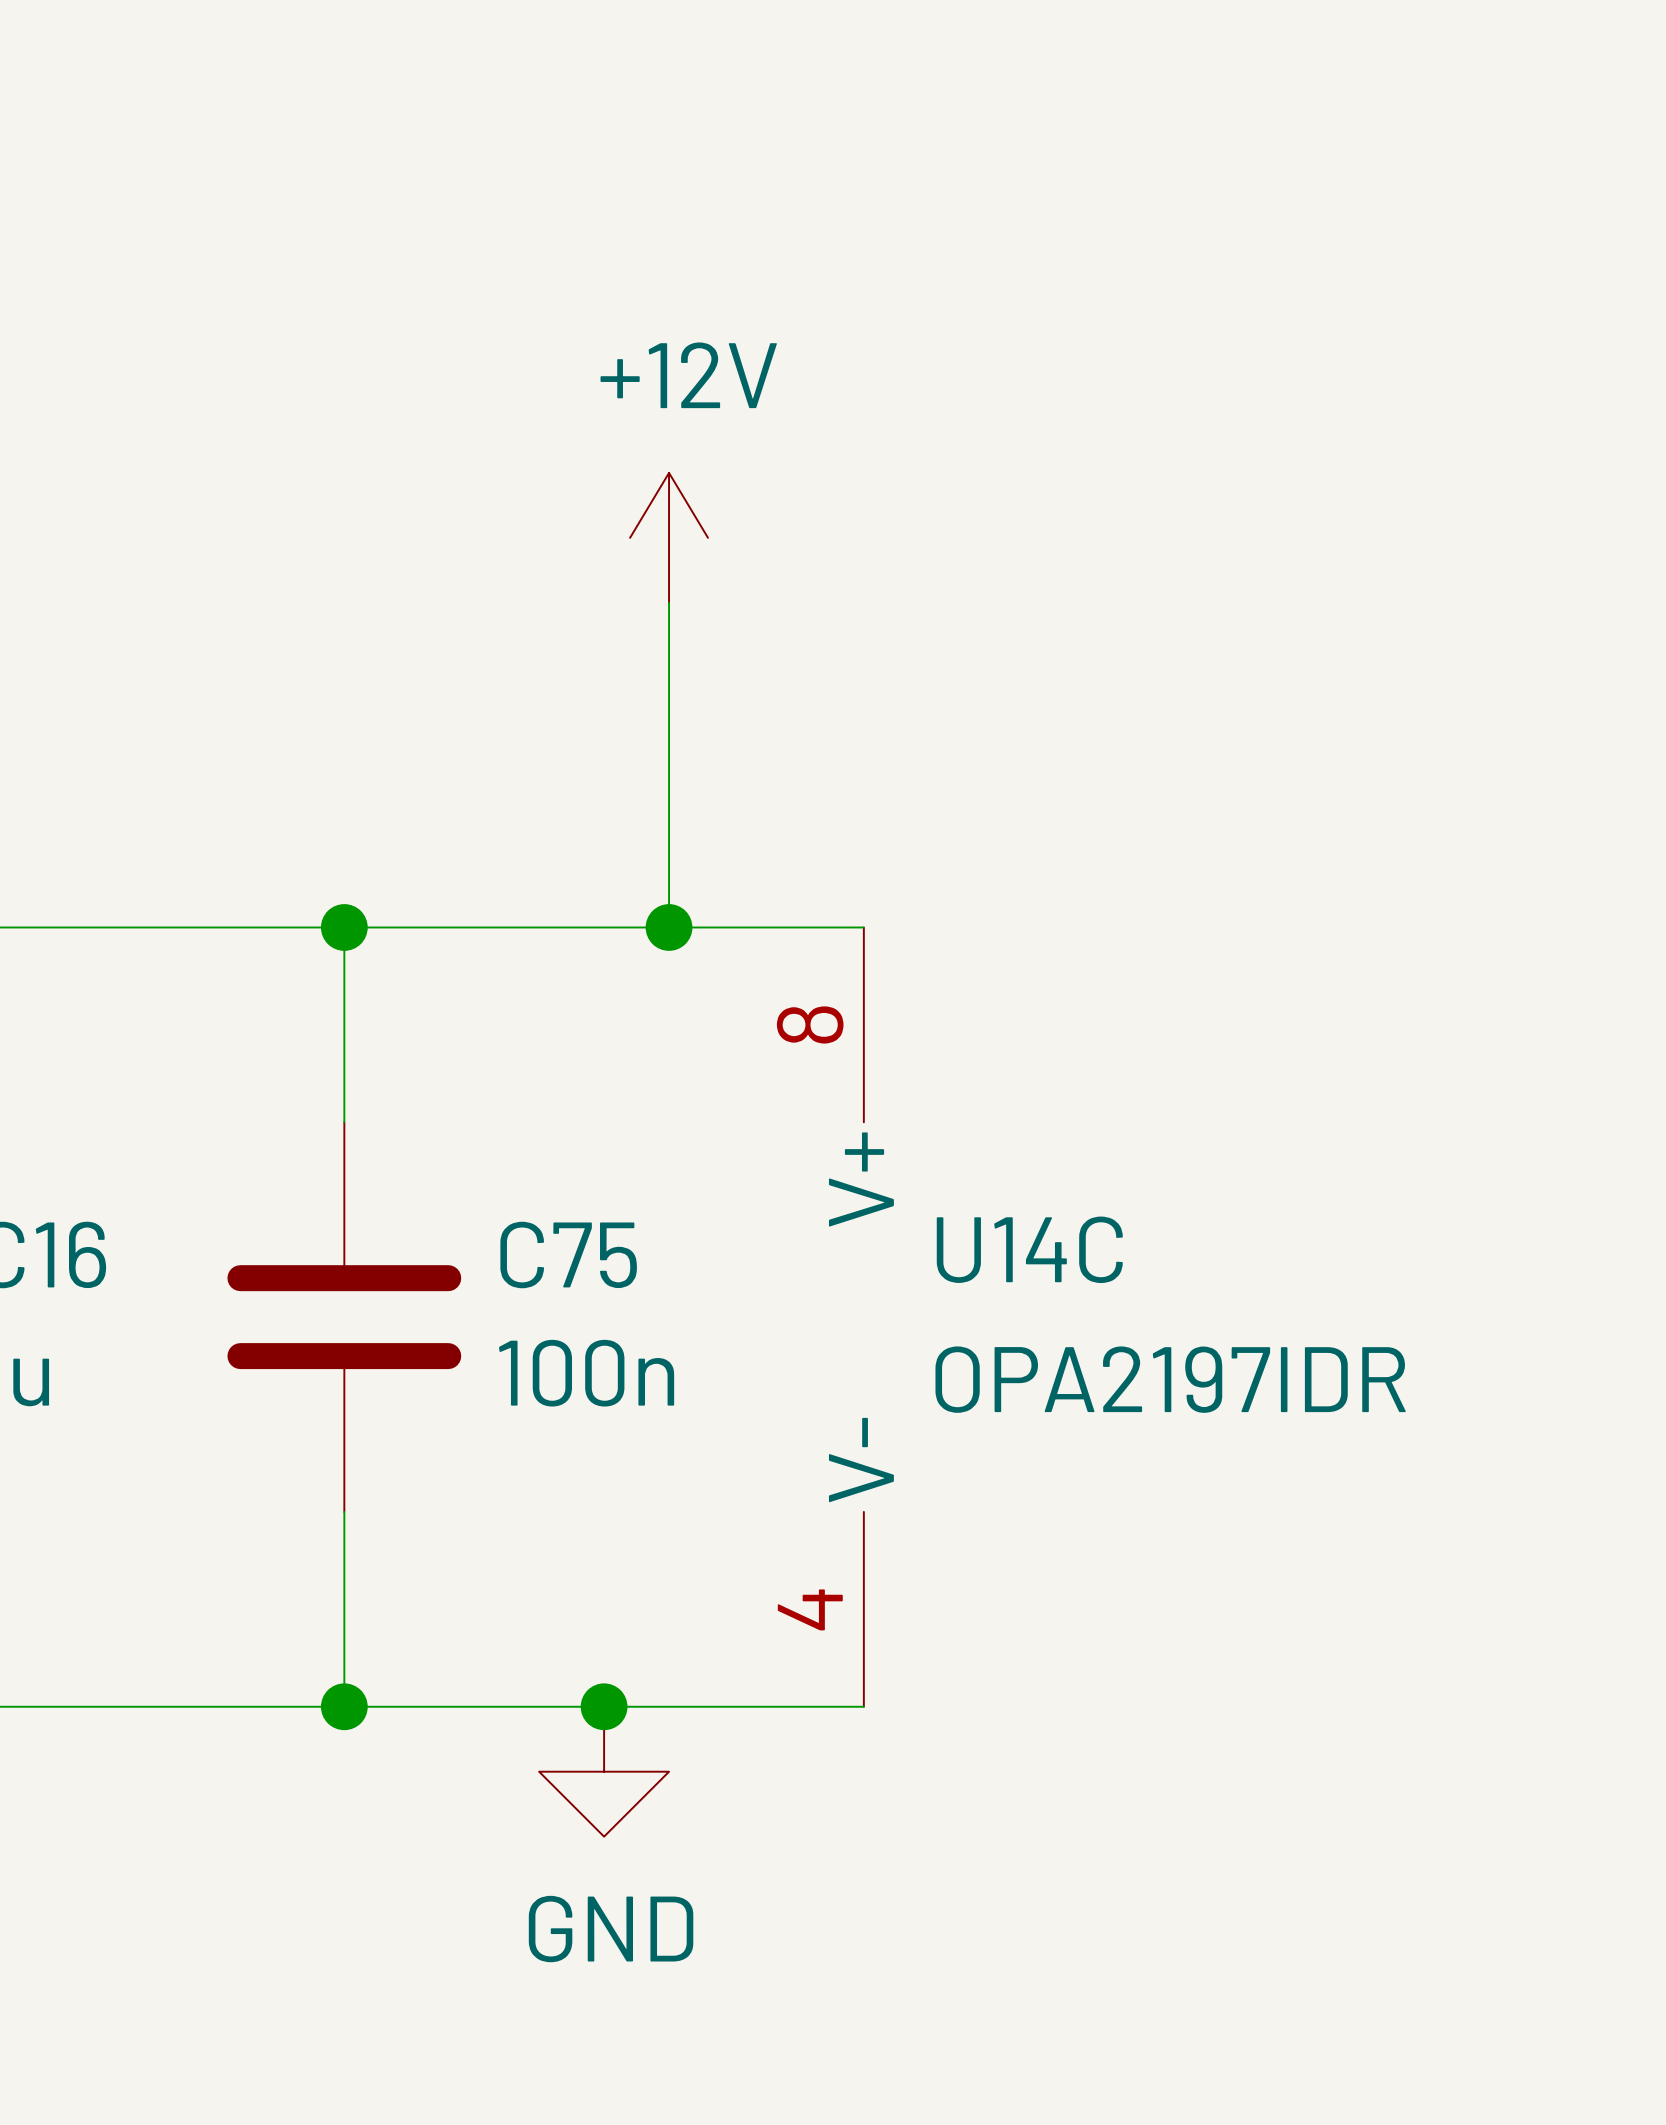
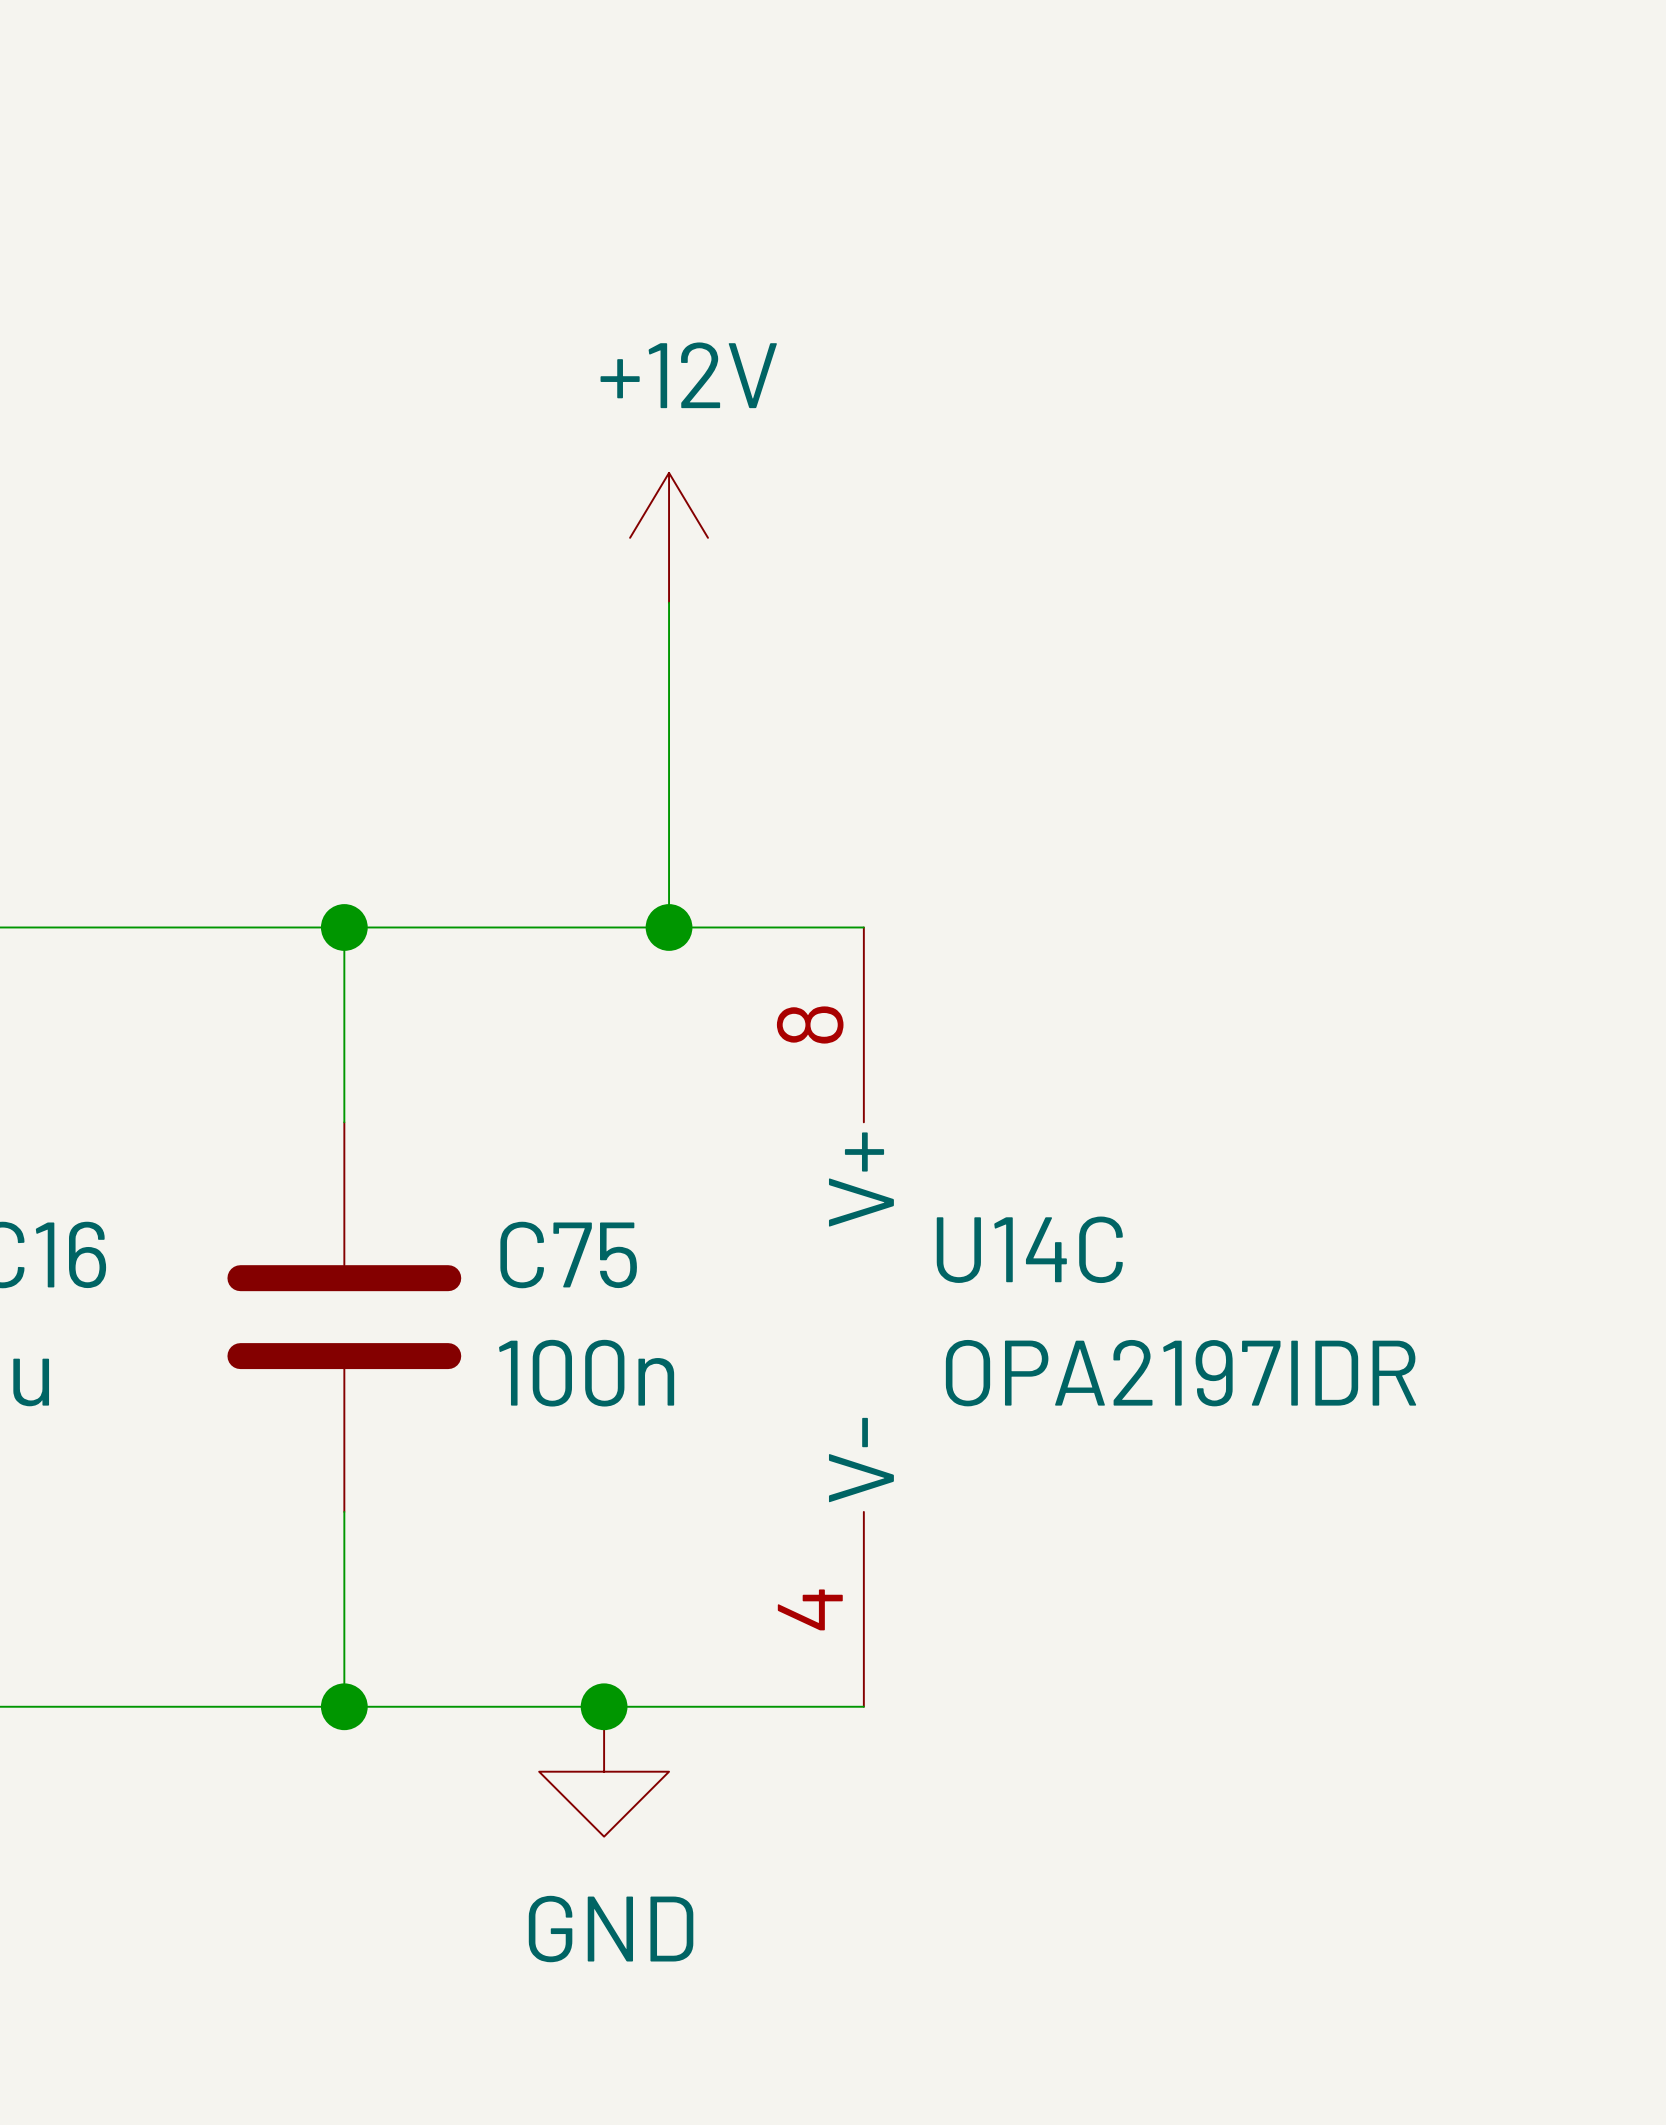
U14C value position: OPA2197IDR (1170, 1379) -> OPA2197IDR (1181, 1373)

